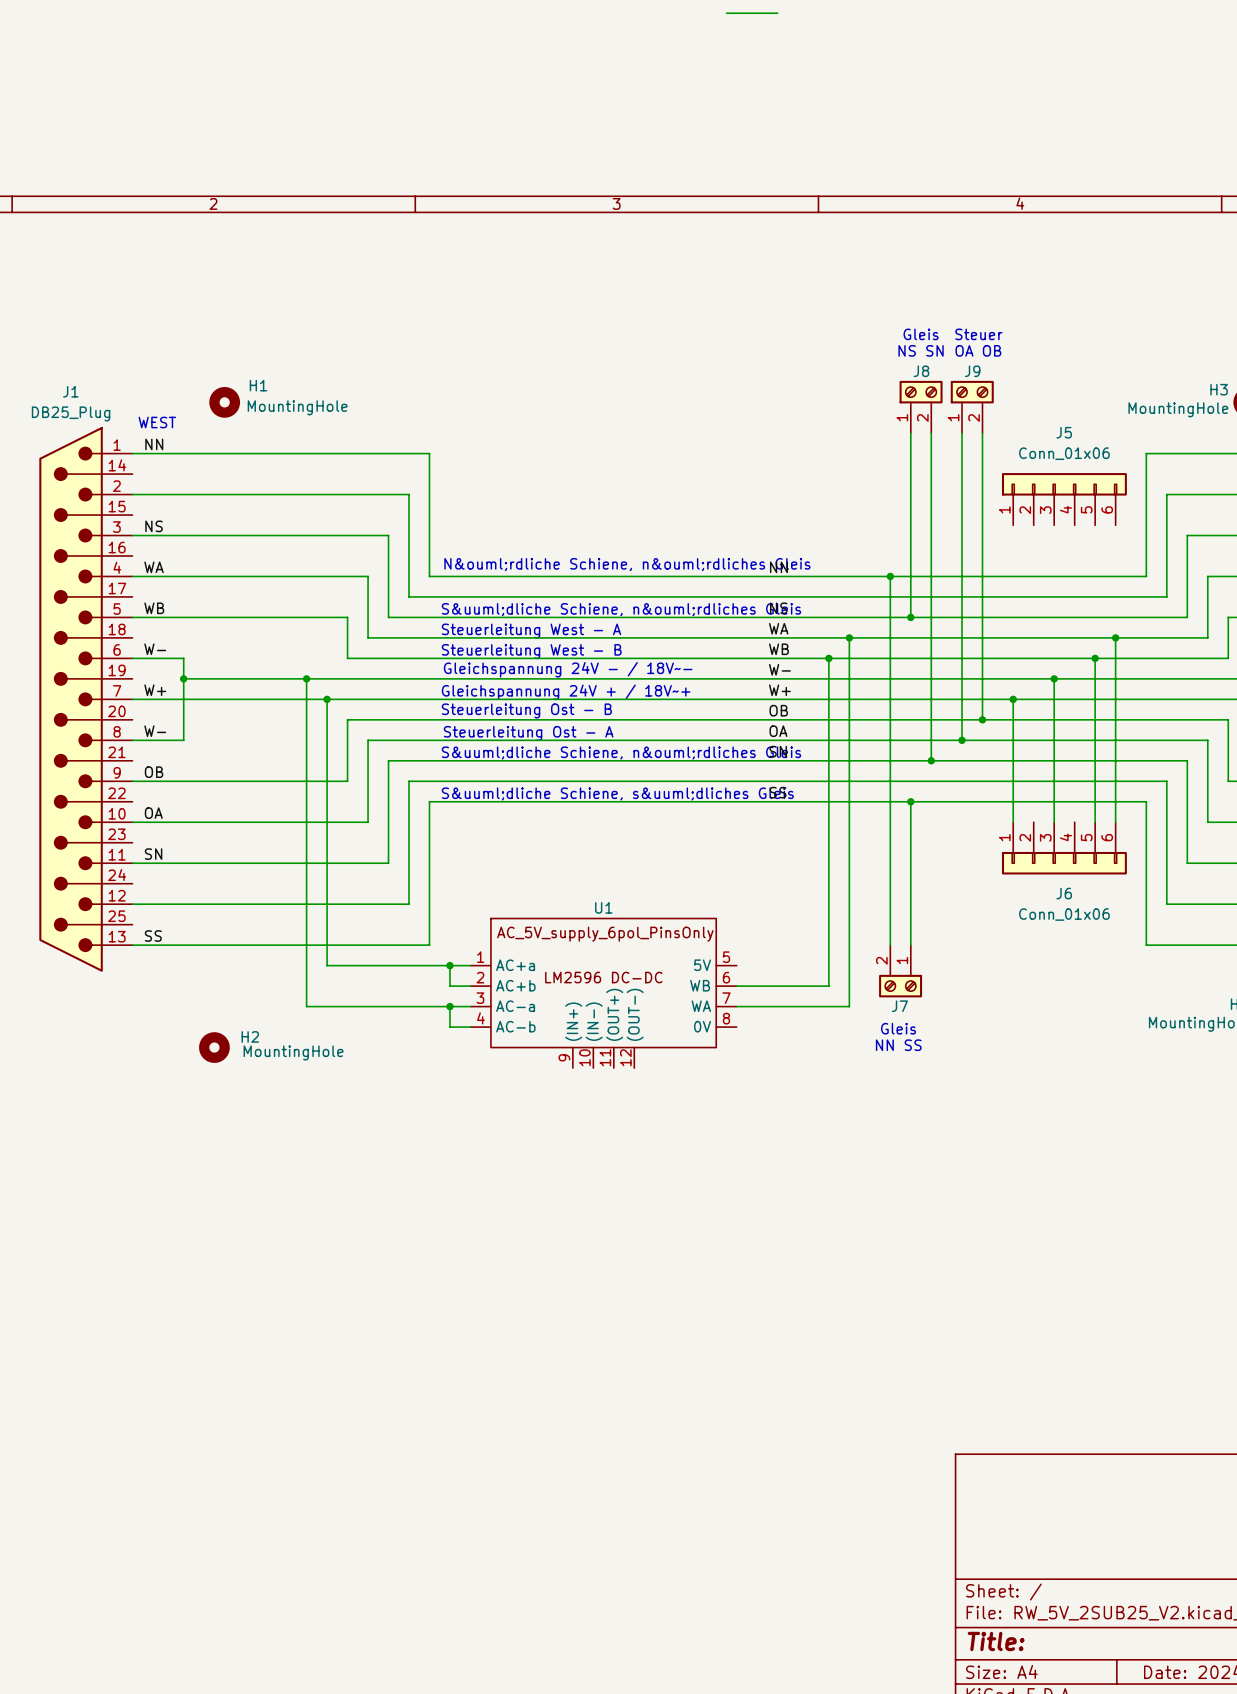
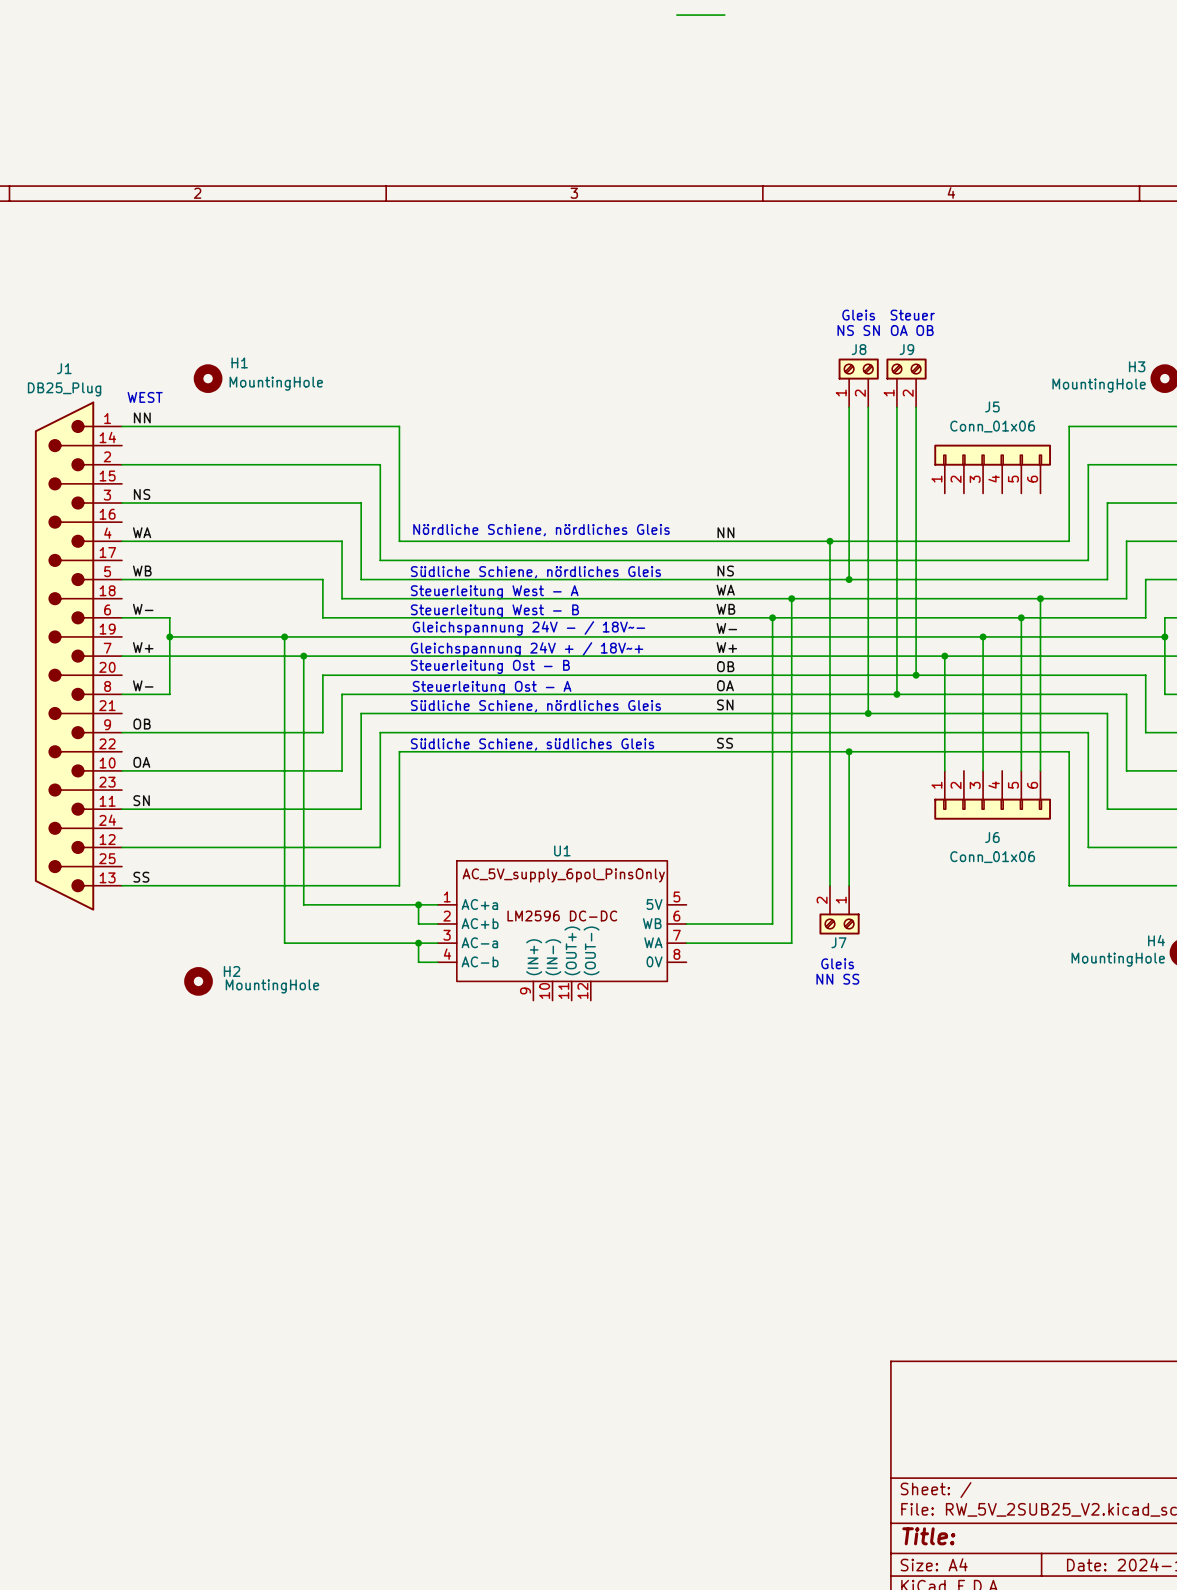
text: N&ouml;rdliche Schiene, n&ouml;rdliches Gleis (627, 564) -> Nördliche Schiene, nördliches Gleis (541, 530)
text: S&uuml;dliche Schiene, n&ouml;rdliches Gleis (621, 609) -> Südliche Schiene, nördliches Gleis (535, 572)
text: S&uuml;dliche Schiene, n&ouml;rdliches Gleis (621, 753) -> Südliche Schiene, nördliches Gleis (535, 706)
text: S&uuml;dliche Schiene, s&uuml;dliches Gleis (617, 793) -> Südliche Schiene, südliches Gleis (532, 744)

